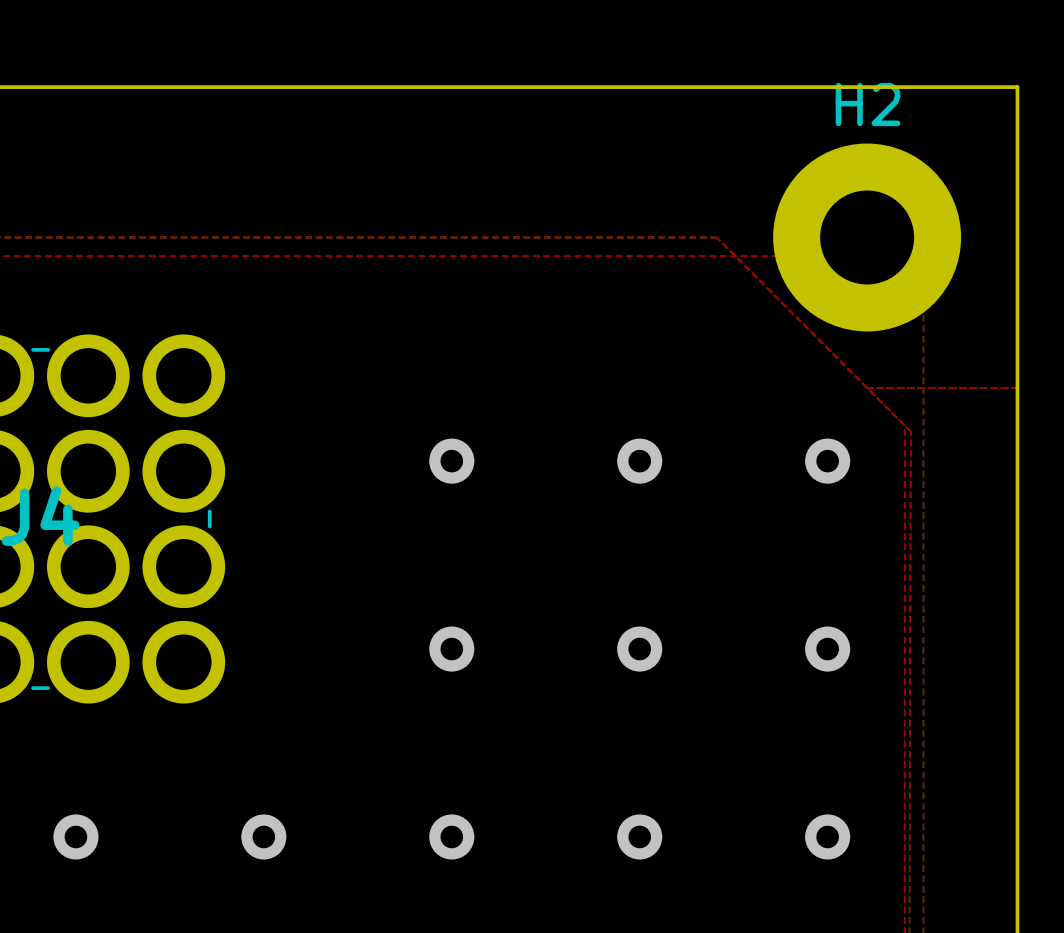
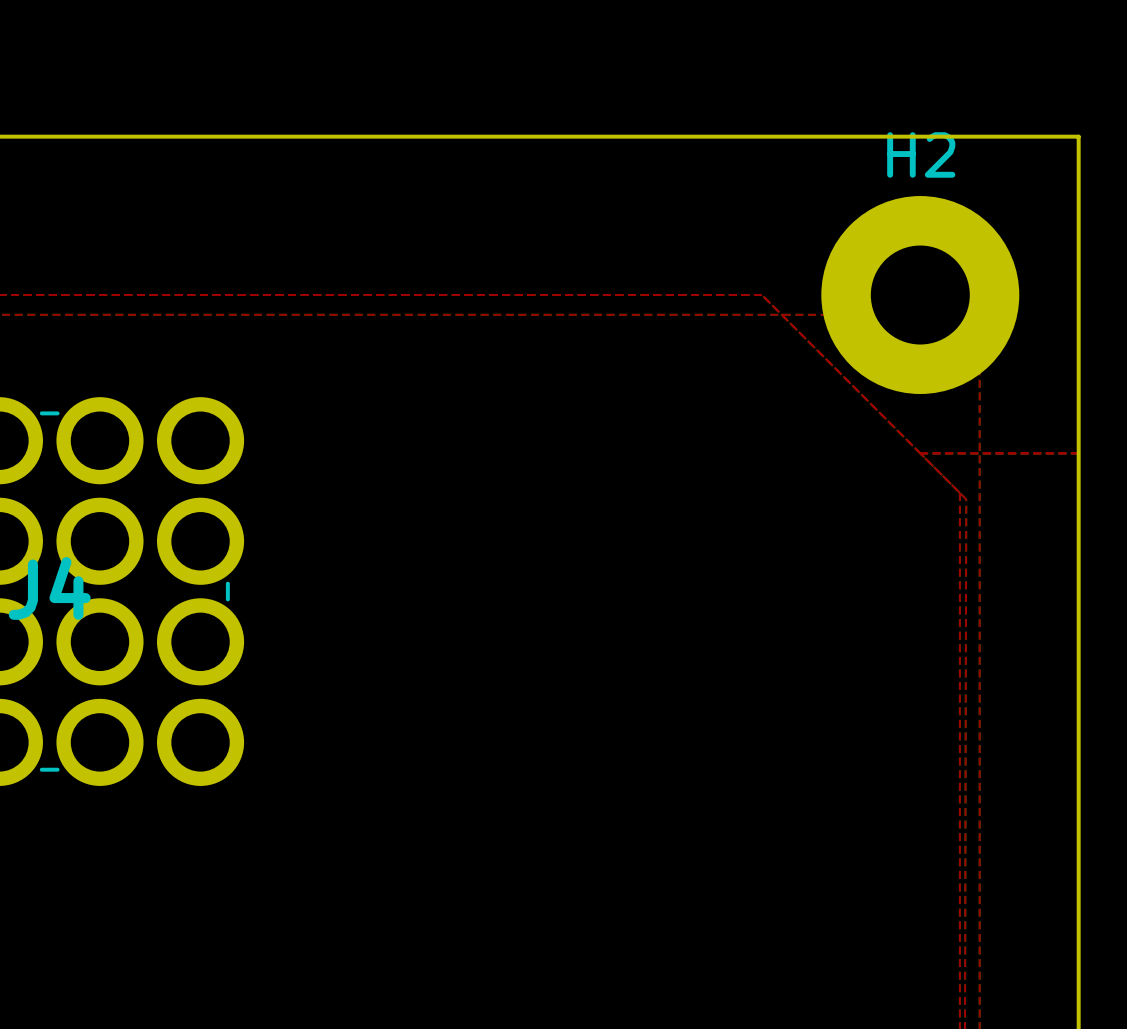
via: (451, 461) -> none
via: (639, 461) -> none
via: (827, 461) -> none
via: (451, 649) -> none
via: (639, 649) -> none
via: (827, 649) -> none
via: (75, 836) -> none
via: (263, 836) -> none
via: (451, 836) -> none
via: (639, 836) -> none
via: (827, 836) -> none

